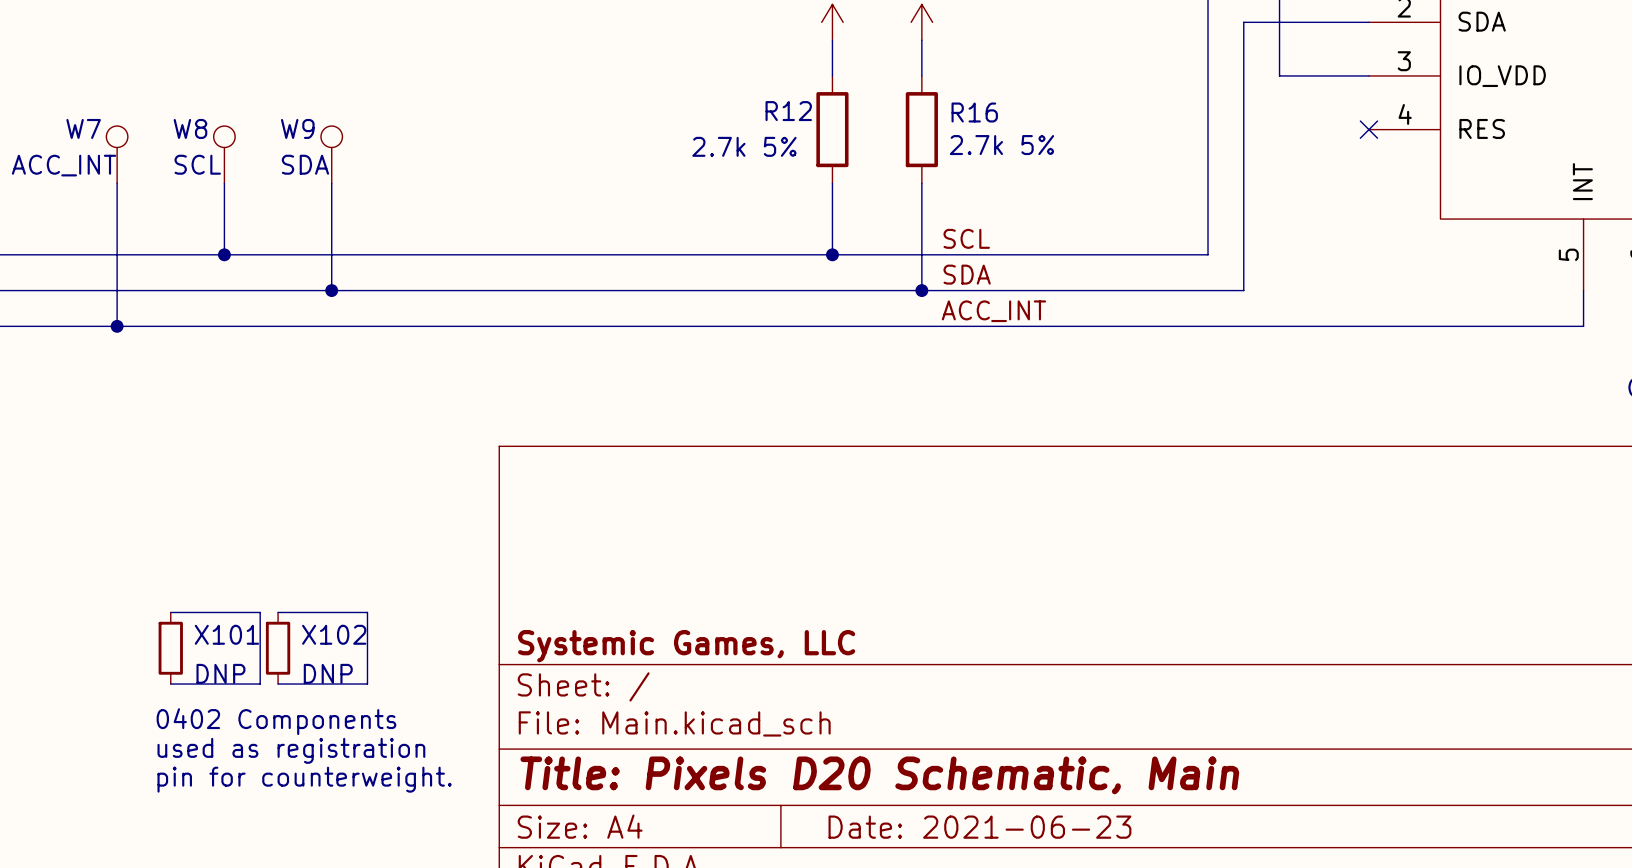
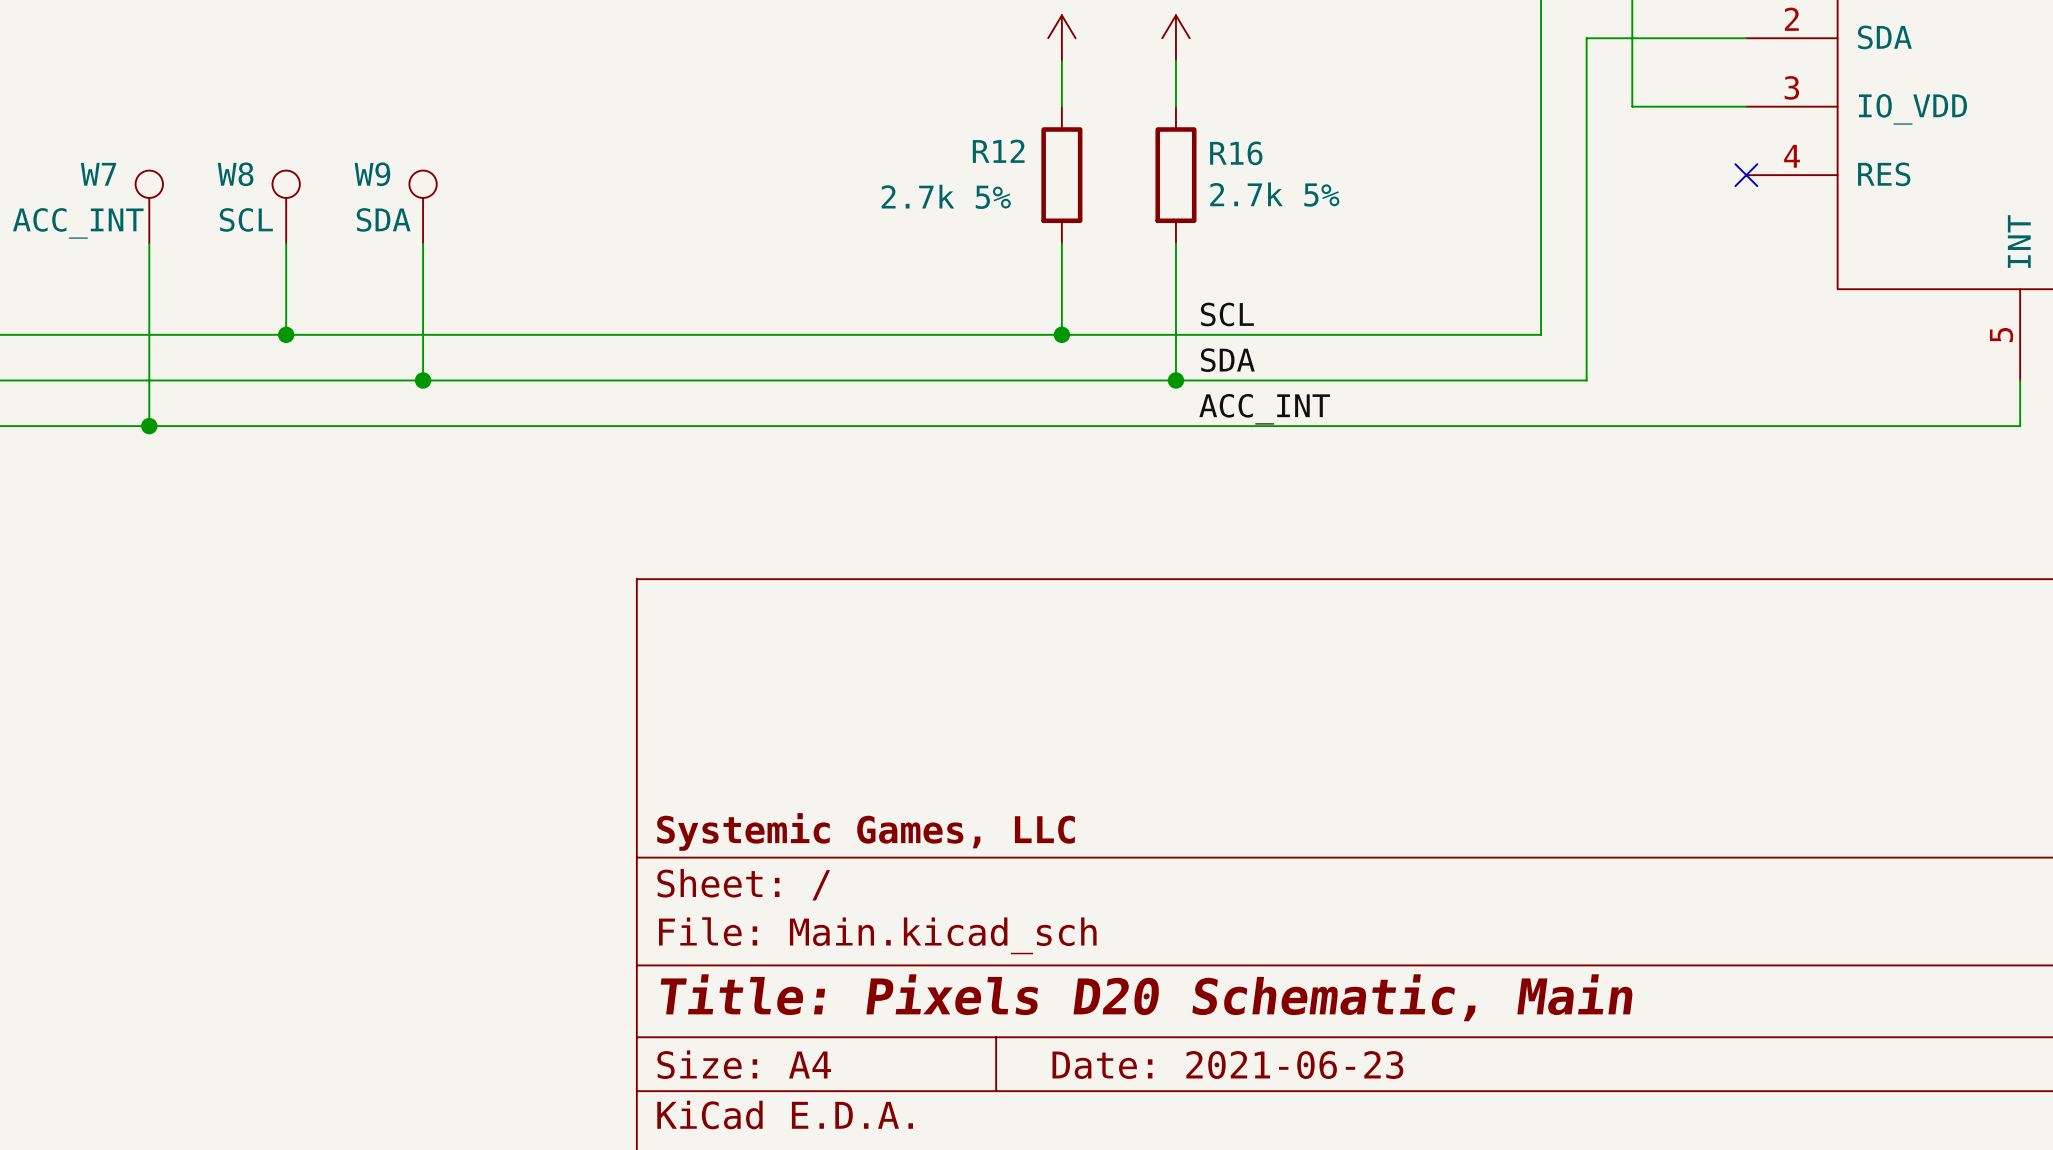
wire: (170, 612) (260, 612) (260, 684) (170, 684) -> none
wire: (278, 612) (367, 612) (367, 684) (278, 684) -> none
X101: DNP (170, 648) -> none
X102: DNP (278, 648) -> none
text: 0402 Components (276, 721) -> none
text: used as registration (291, 750) -> none
text: pin for counterweight. (304, 779) -> none

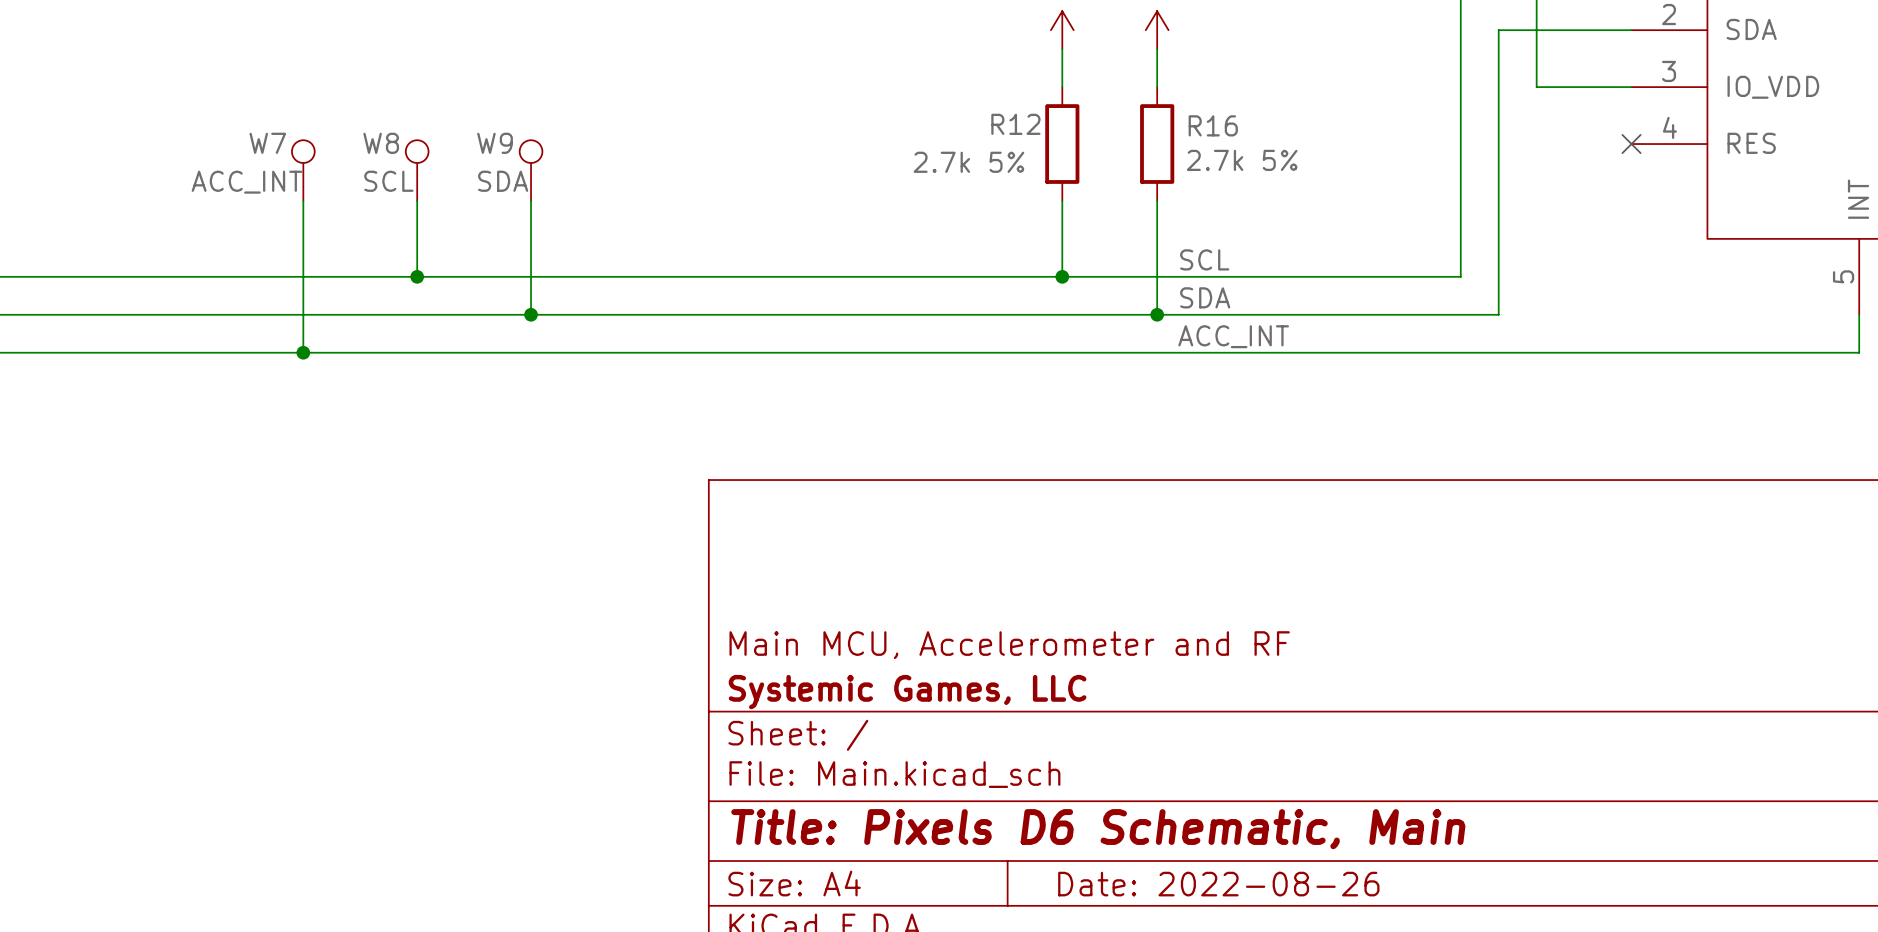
title block: none -> Main MCU, Accelerometer and RF (1009, 645)
title block: Title: Pixels D20 Schematic, Main (1146, 997) -> Title: Pixels D6 Schematic, Main (1098, 829)
title block: Date: 2021-06-23 (1227, 1065) -> Date: 2022-08-26 (1218, 884)

